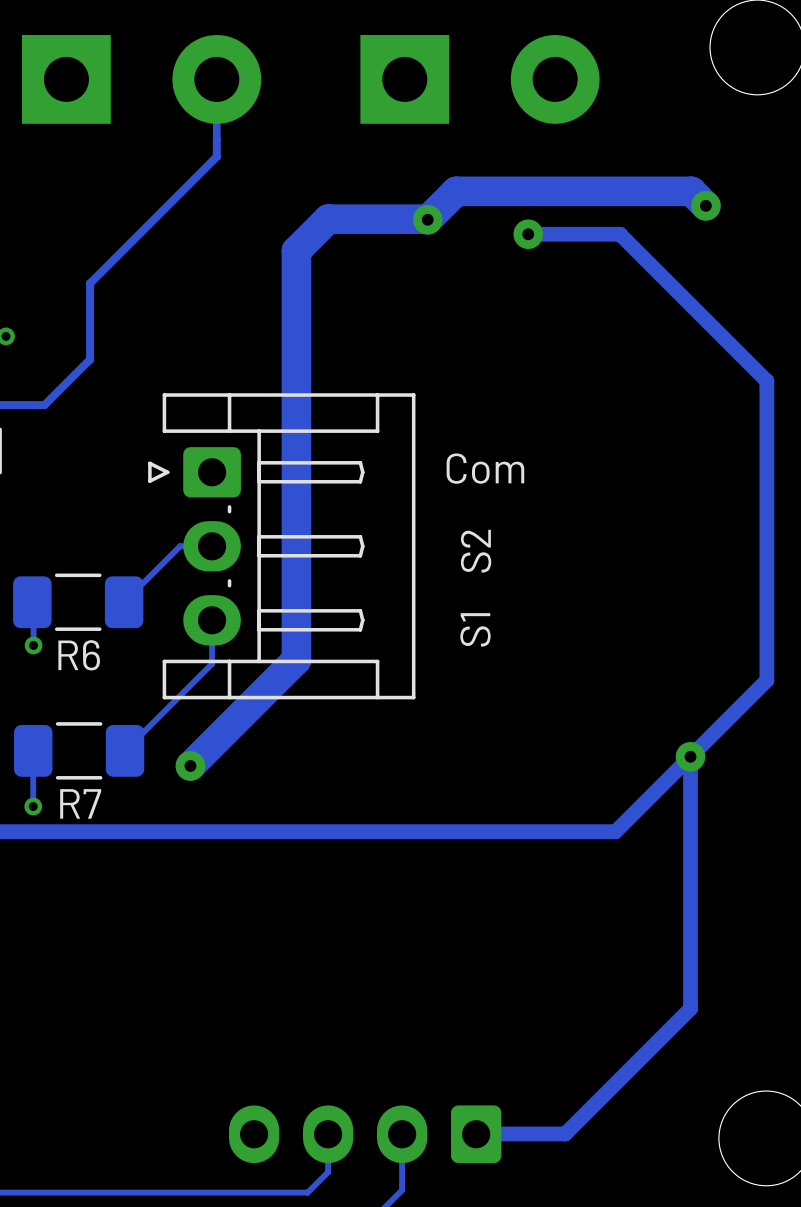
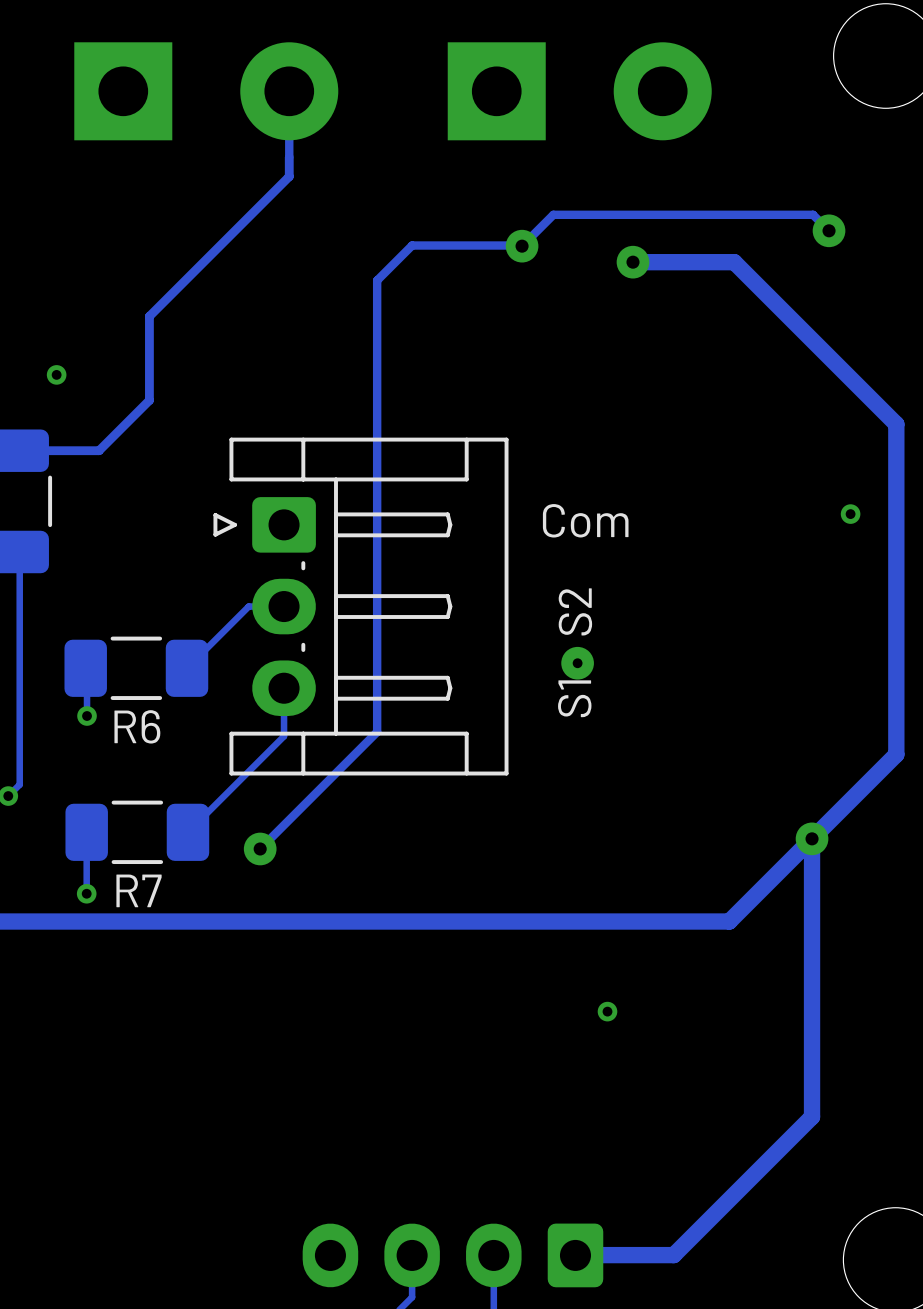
track width: thick (705, 205) (691, 191) (456, 191) (427, 219) -> thin (829, 230) (813, 214) (553, 214) (522, 246)
track width: thick (427, 219) (328, 219) (296, 250) (296, 659) (190, 765) -> thin (521, 245) (412, 245) (377, 280) (377, 732) (260, 848)
via: none -> (850, 514)
via: none -> (577, 663)
via: none -> (607, 1011)

